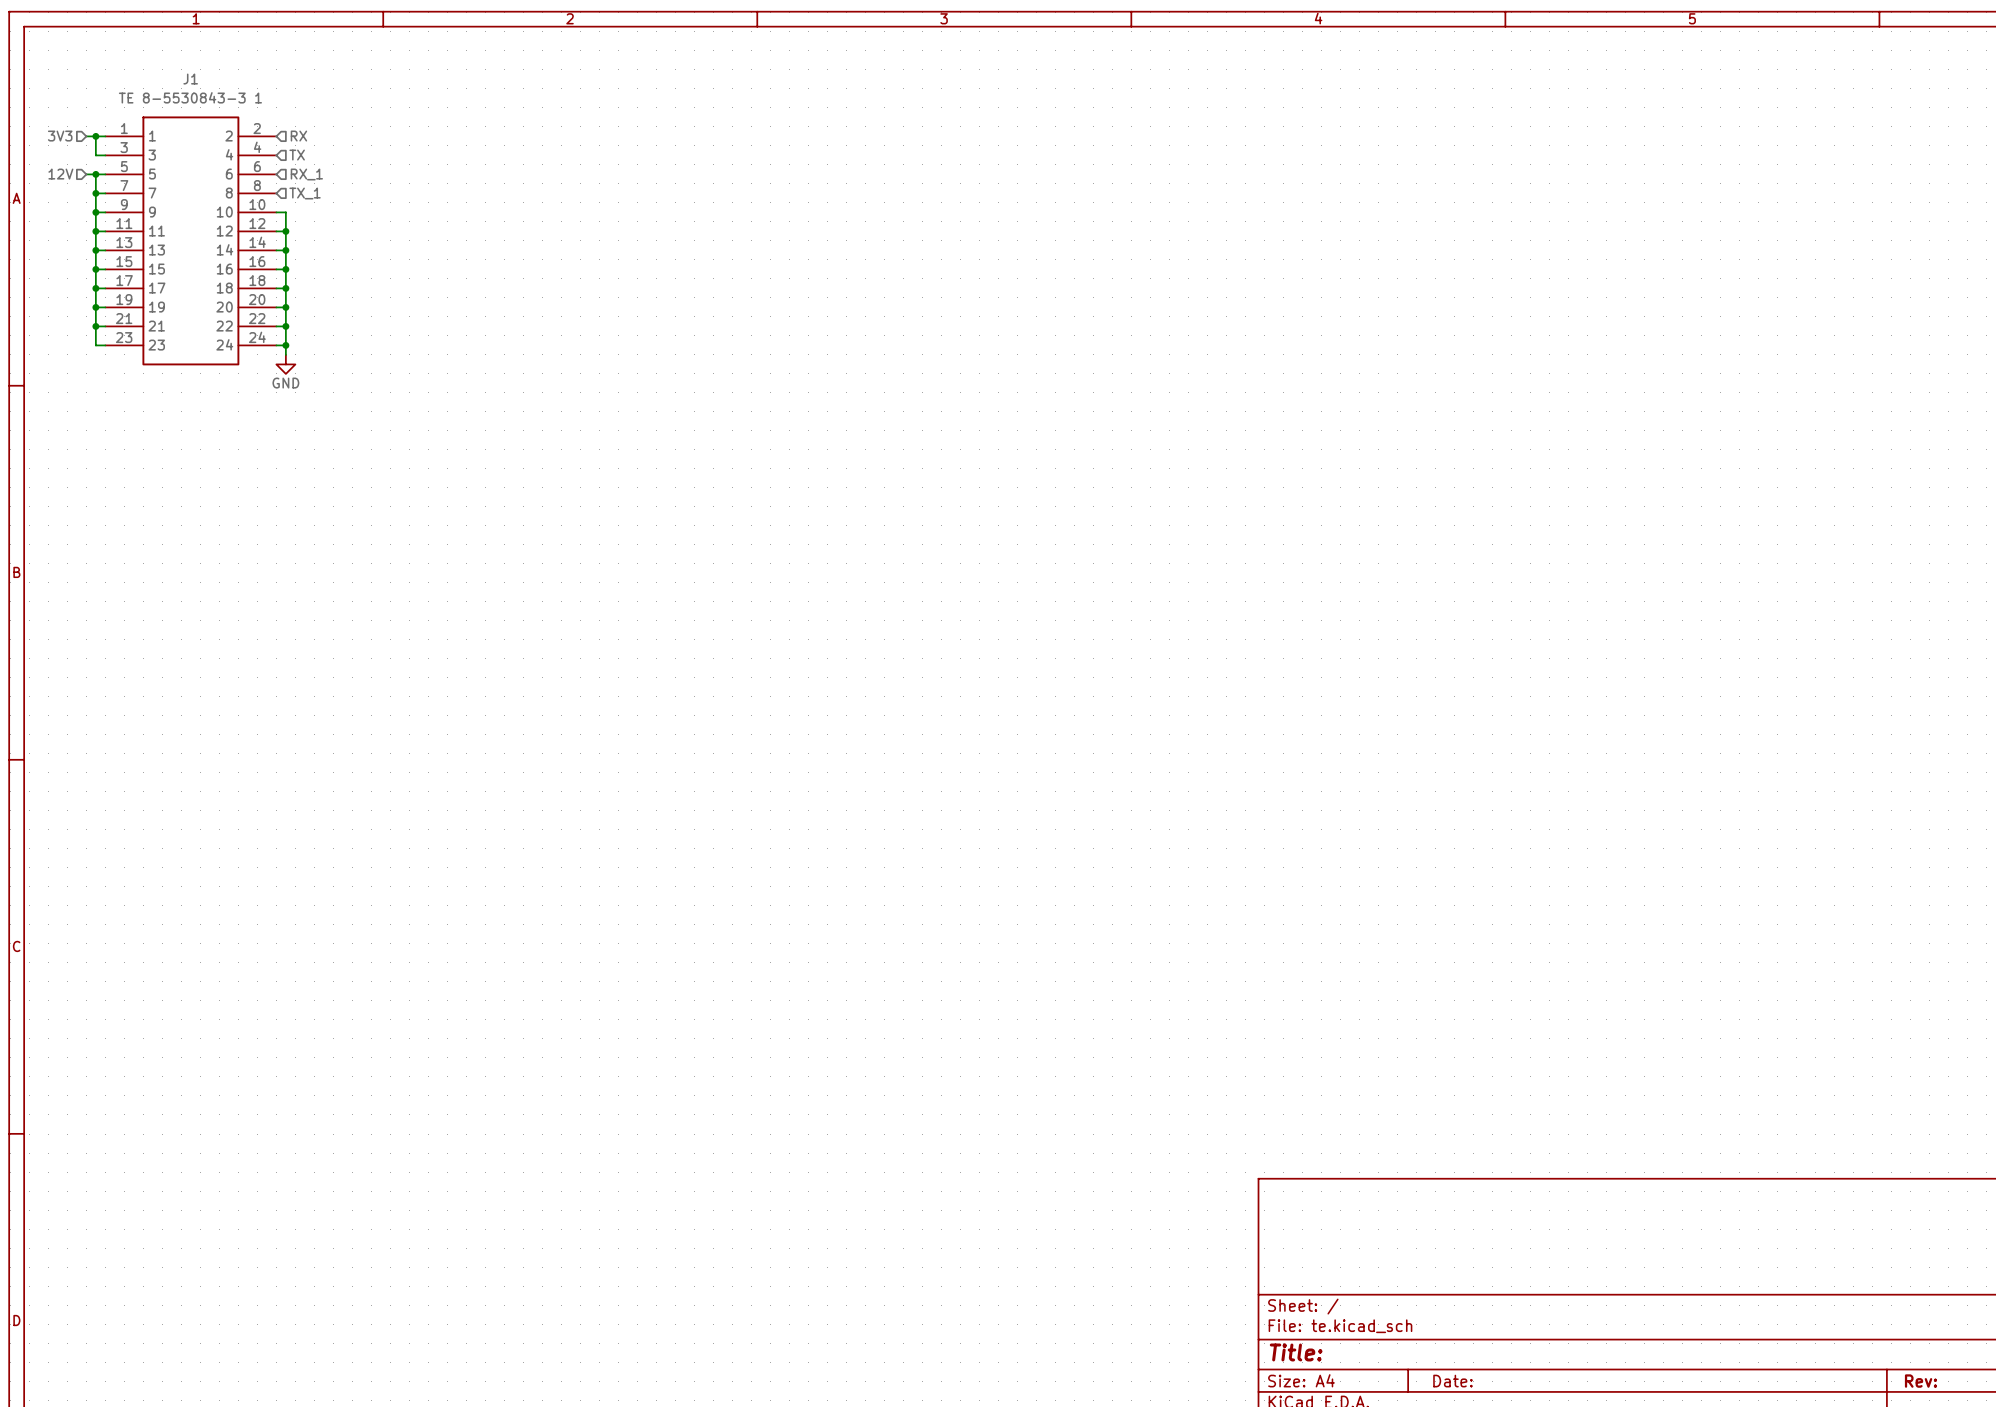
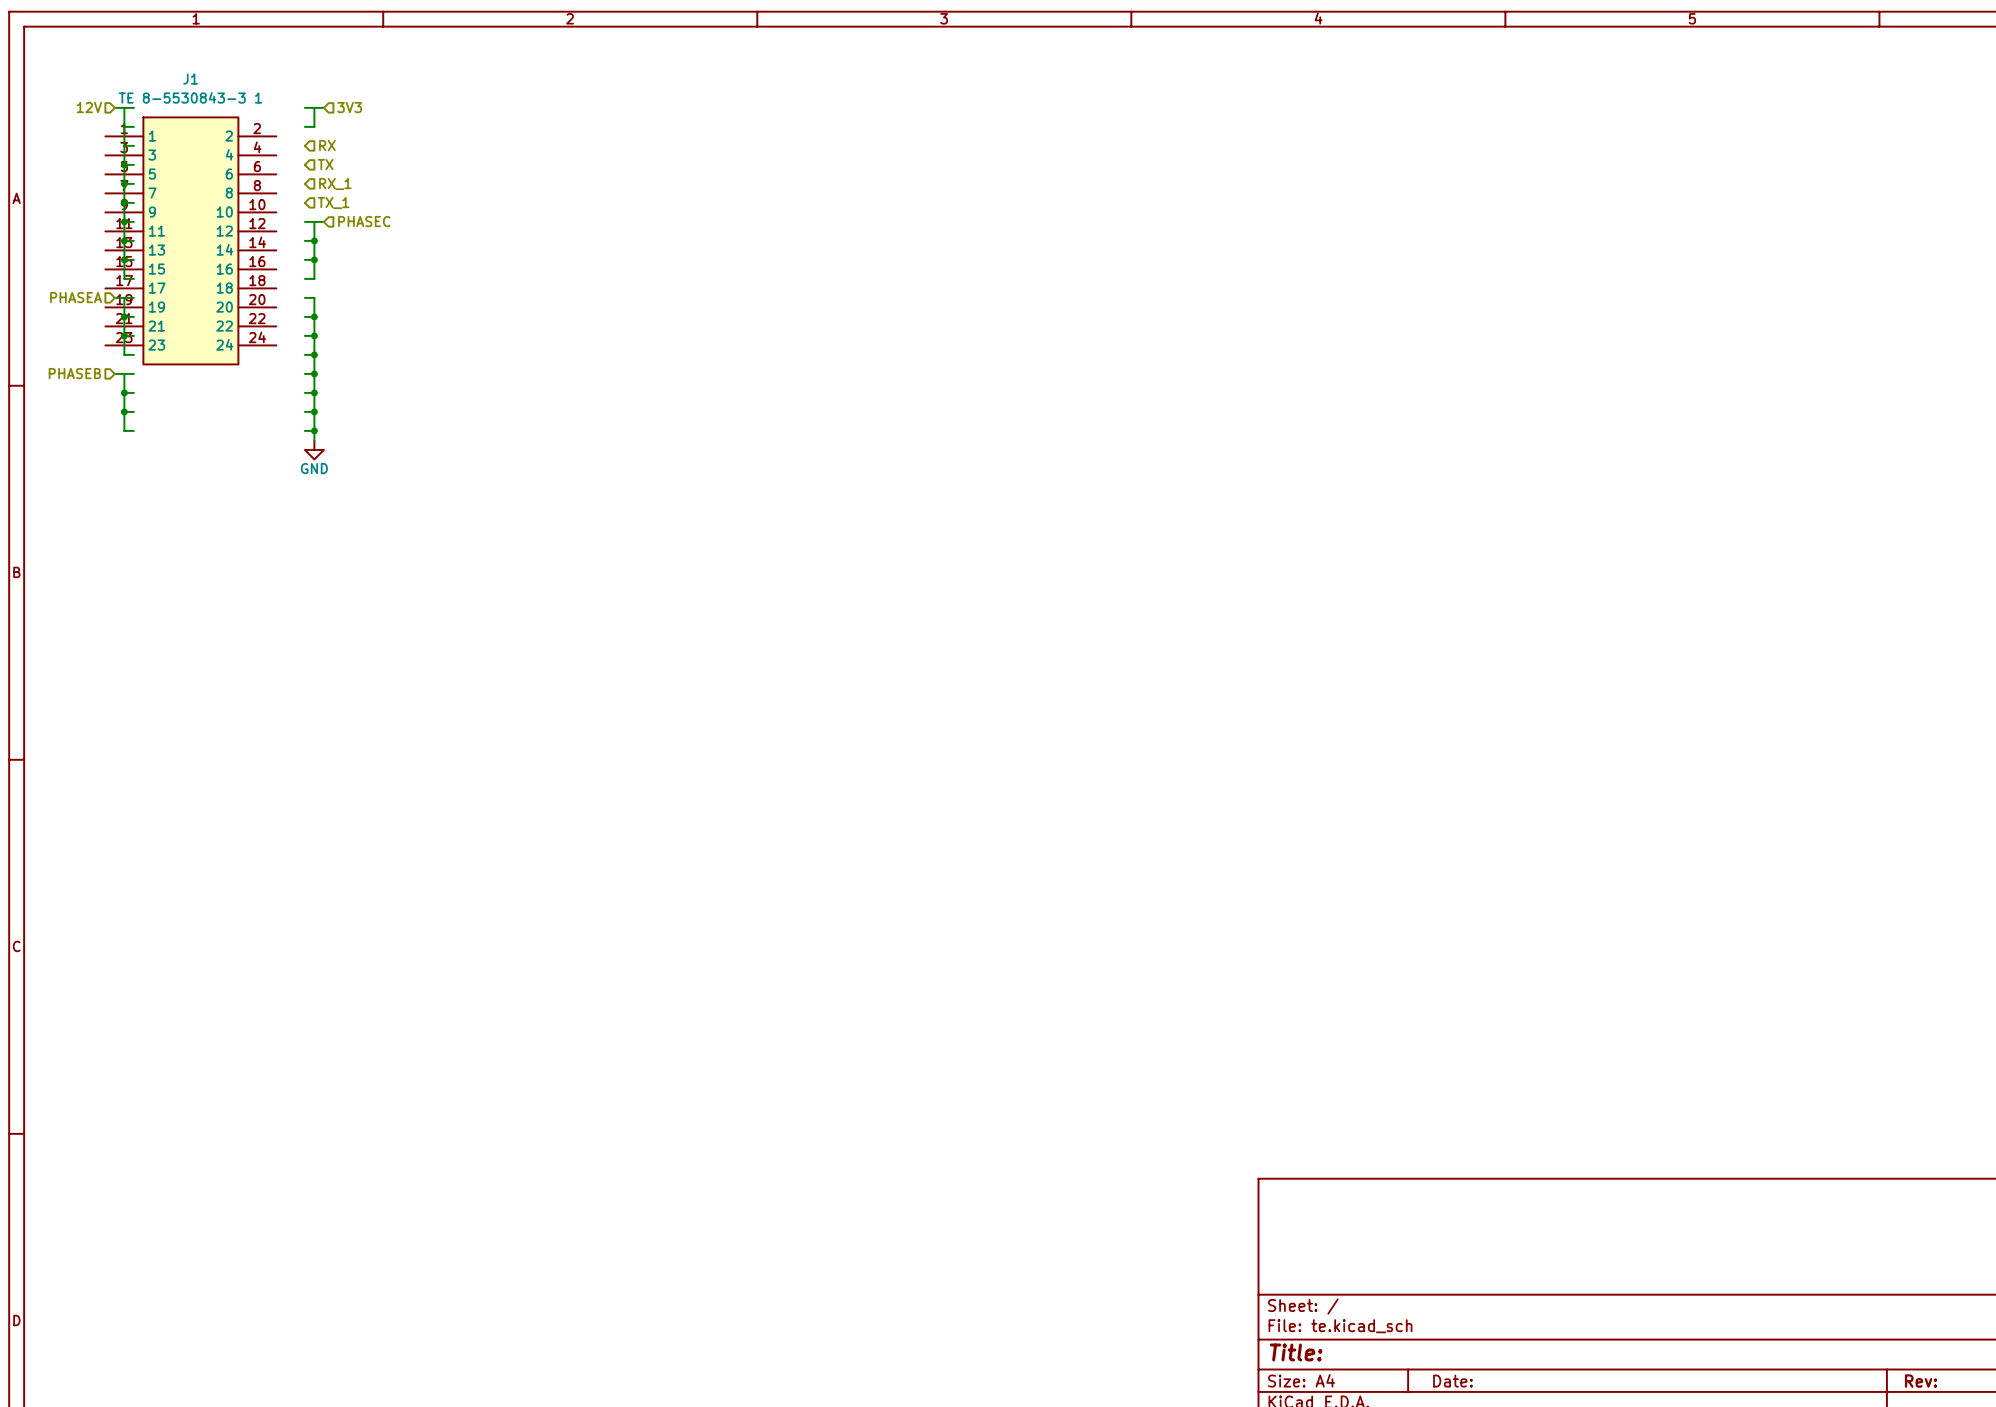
wire: none -> (304, 107) (323, 107)
wire: none -> (314, 107) (314, 126) (304, 126)
hierarchical label: none -> 3V3 (349, 107)
hierarchical label: 3V3 (60, 136) -> none
wire: (86, 136) (105, 136) -> (114, 297) (133, 297)
wire: (95, 136) (95, 155) (105, 155) -> none
junction: (95, 136) -> none
hierarchical label position: RX (298, 136) -> RX (327, 145)
hierarchical label position: TX (297, 155) -> TX (325, 164)
junction: none -> (124, 164)
hierarchical label position: 12V (60, 174) -> 12V (89, 107)
wire: (86, 174) (105, 174) -> (114, 107) (133, 107)
wire: (95, 174) (95, 345) (105, 345) -> (124, 107) (124, 278) (133, 278)
junction: (95, 174) -> none
hierarchical label position: RX_1 (306, 174) -> RX_1 (335, 184)
junction: none -> (124, 183)
wire: (95, 193) (105, 193) -> (124, 126) (133, 126)
junction: (95, 193) -> none
hierarchical label position: TX_1 (305, 193) -> TX_1 (333, 203)
junction: none -> (124, 202)
wire: (95, 212) (105, 212) -> (124, 145) (133, 145)
junction: (95, 212) -> none
wire: (276, 212) (285, 212) (285, 354) -> (304, 297) (314, 297) (314, 440)
junction: none -> (124, 221)
wire: none -> (304, 221) (323, 221)
wire: none -> (314, 221) (314, 278) (304, 278)
hierarchical label: none -> PHASEC (364, 221)
wire: (95, 231) (105, 231) -> (124, 164) (133, 164)
junction: (95, 231) -> none
wire: (276, 231) (285, 231) -> (304, 316) (314, 316)
junction: (285, 231) -> none
junction: none -> (124, 240)
junction: none -> (314, 240)
wire: (95, 250) (105, 250) -> (124, 183) (133, 183)
junction: (95, 250) -> none
wire: (276, 250) (285, 250) -> (304, 335) (314, 335)
junction: (285, 250) -> none
junction: none -> (124, 259)
junction: none -> (314, 259)
wire: (95, 269) (105, 269) -> (124, 202) (133, 202)
junction: (95, 269) -> none
wire: (276, 269) (285, 269) -> (304, 354) (314, 354)
junction: (285, 269) -> none
wire: (95, 288) (105, 288) -> (124, 221) (133, 221)
junction: (95, 288) -> none
wire: (276, 288) (285, 288) -> (304, 373) (314, 373)
junction: (285, 288) -> none
hierarchical label: none -> PHASEA (76, 297)
wire: none -> (124, 297) (124, 354) (133, 354)
wire: (95, 307) (105, 307) -> (124, 240) (133, 240)
junction: (95, 307) -> none
wire: (276, 307) (285, 307) -> (304, 240) (314, 240)
junction: (285, 307) -> none
wire: none -> (124, 316) (133, 316)
junction: none -> (124, 316)
junction: none -> (314, 316)
wire: (95, 326) (105, 326) -> (124, 259) (133, 259)
junction: (95, 326) -> none
wire: (276, 326) (285, 326) -> (304, 259) (314, 259)
junction: (285, 326) -> none
wire: none -> (124, 335) (133, 335)
junction: none -> (124, 335)
junction: none -> (314, 335)
wire: (276, 345) (285, 345) -> (304, 430) (314, 430)
junction: (285, 345) -> none
junction: none -> (314, 354)
power symbol position: GND (285, 364) -> GND (314, 449)
hierarchical label: none -> PHASEB (74, 373)
wire: none -> (114, 373) (133, 373)
wire: none -> (124, 373) (124, 430) (133, 430)
junction: none -> (314, 373)
wire: none -> (124, 392) (133, 392)
junction: none -> (124, 392)
wire: none -> (304, 392) (314, 392)
junction: none -> (314, 392)
wire: none -> (124, 411) (133, 411)
junction: none -> (124, 411)
wire: none -> (304, 411) (314, 411)
junction: none -> (314, 411)
junction: none -> (314, 430)

